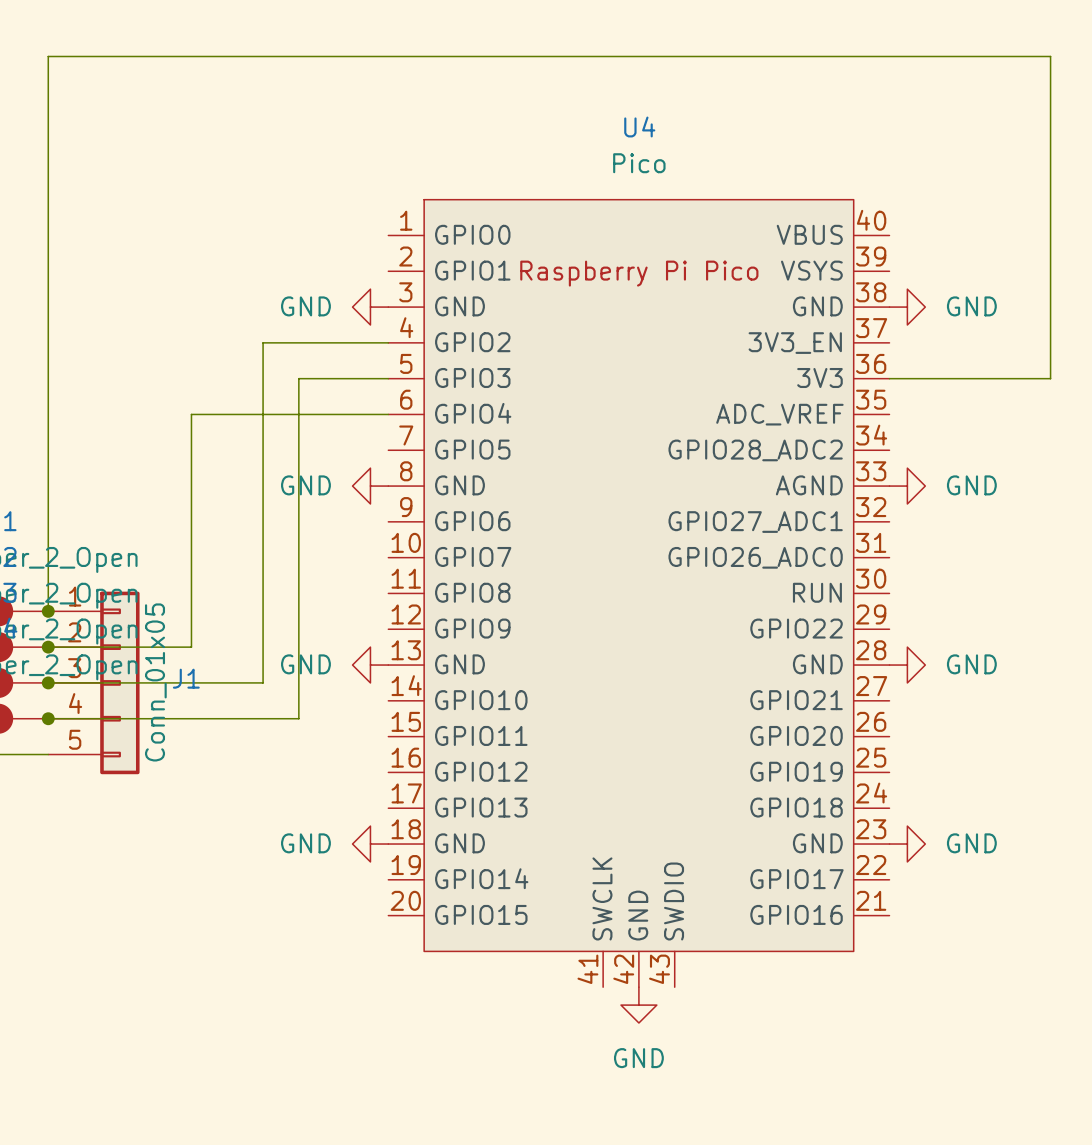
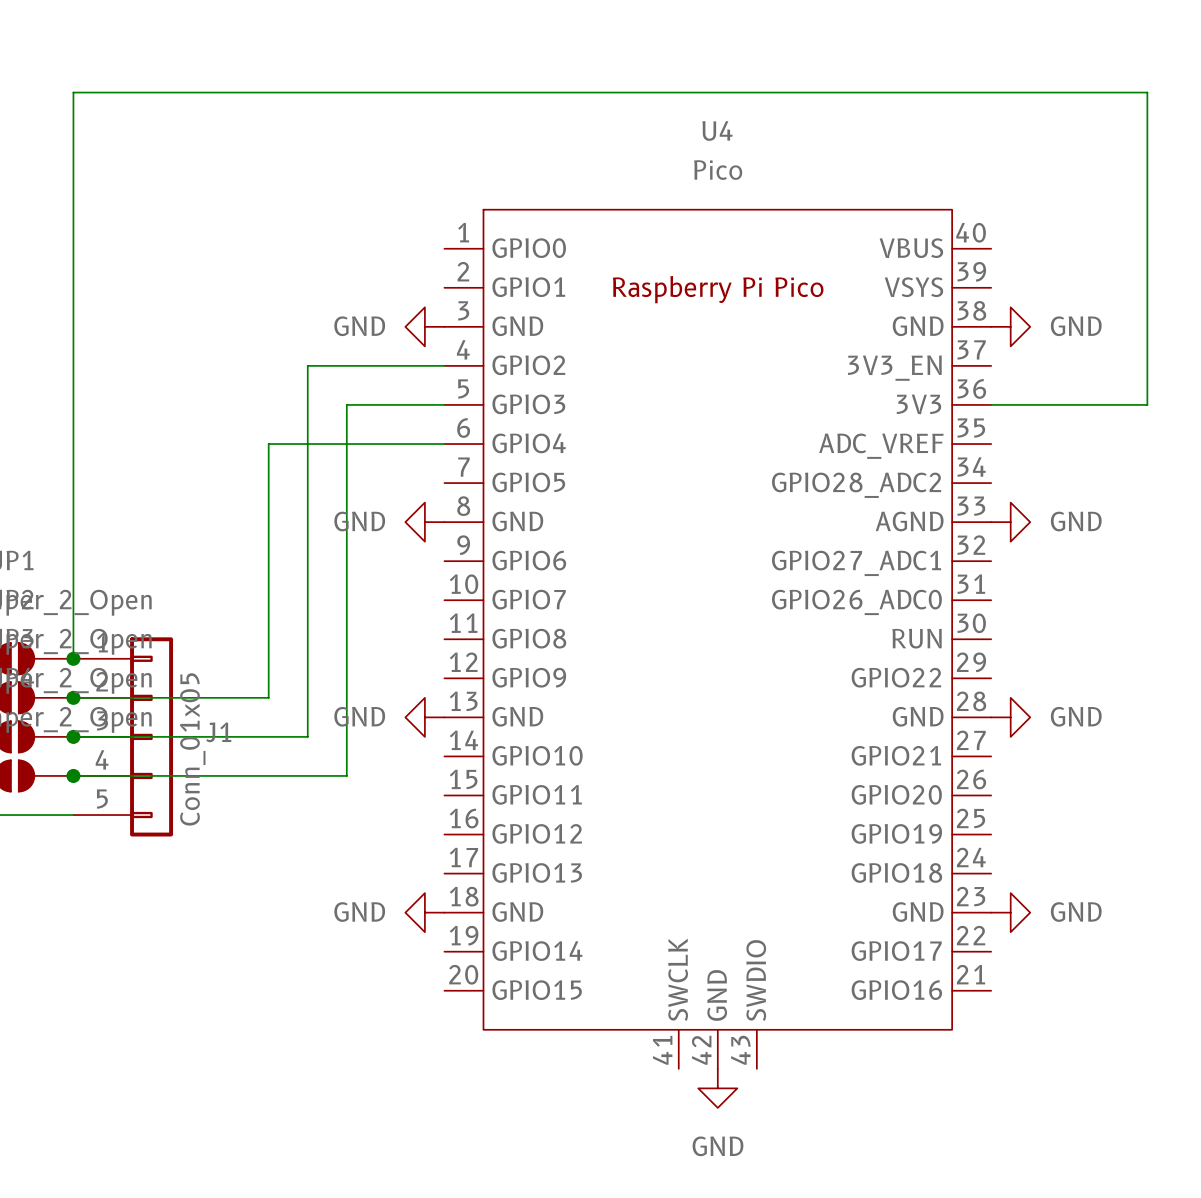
wire: (48, 92) (48, 56) (1050, 56) (1050, 378) (1032, 378) -> (73, 92) (1147, 92) (1147, 404)
wire: (227, 414) (191, 414) (191, 647) -> (268, 444) (268, 697) (229, 697)

